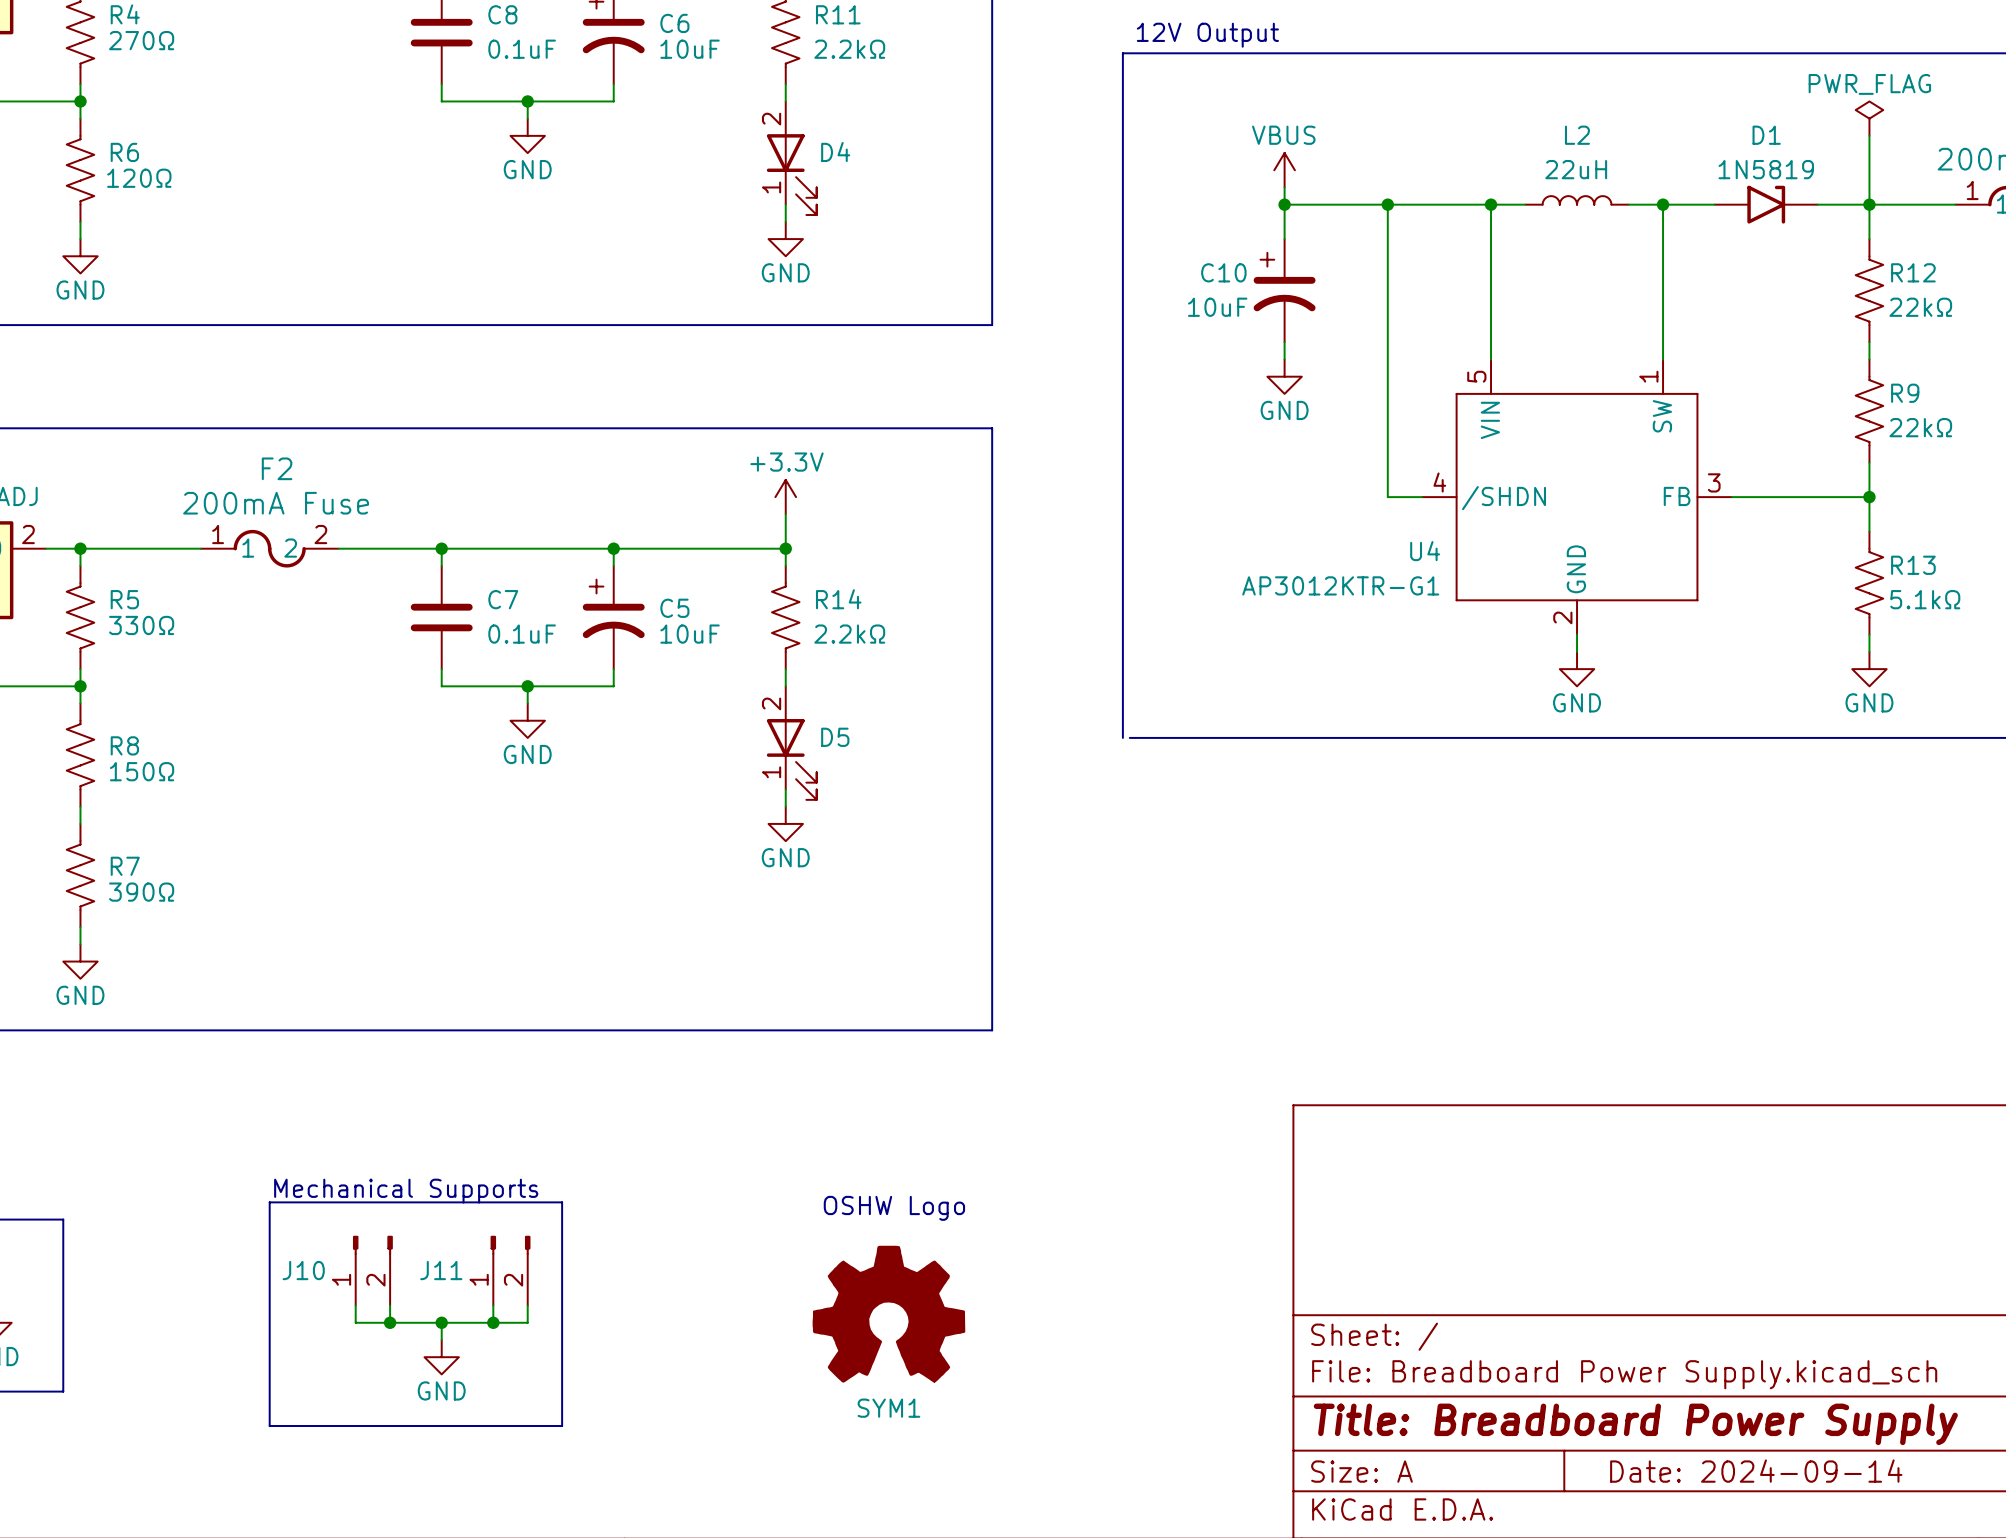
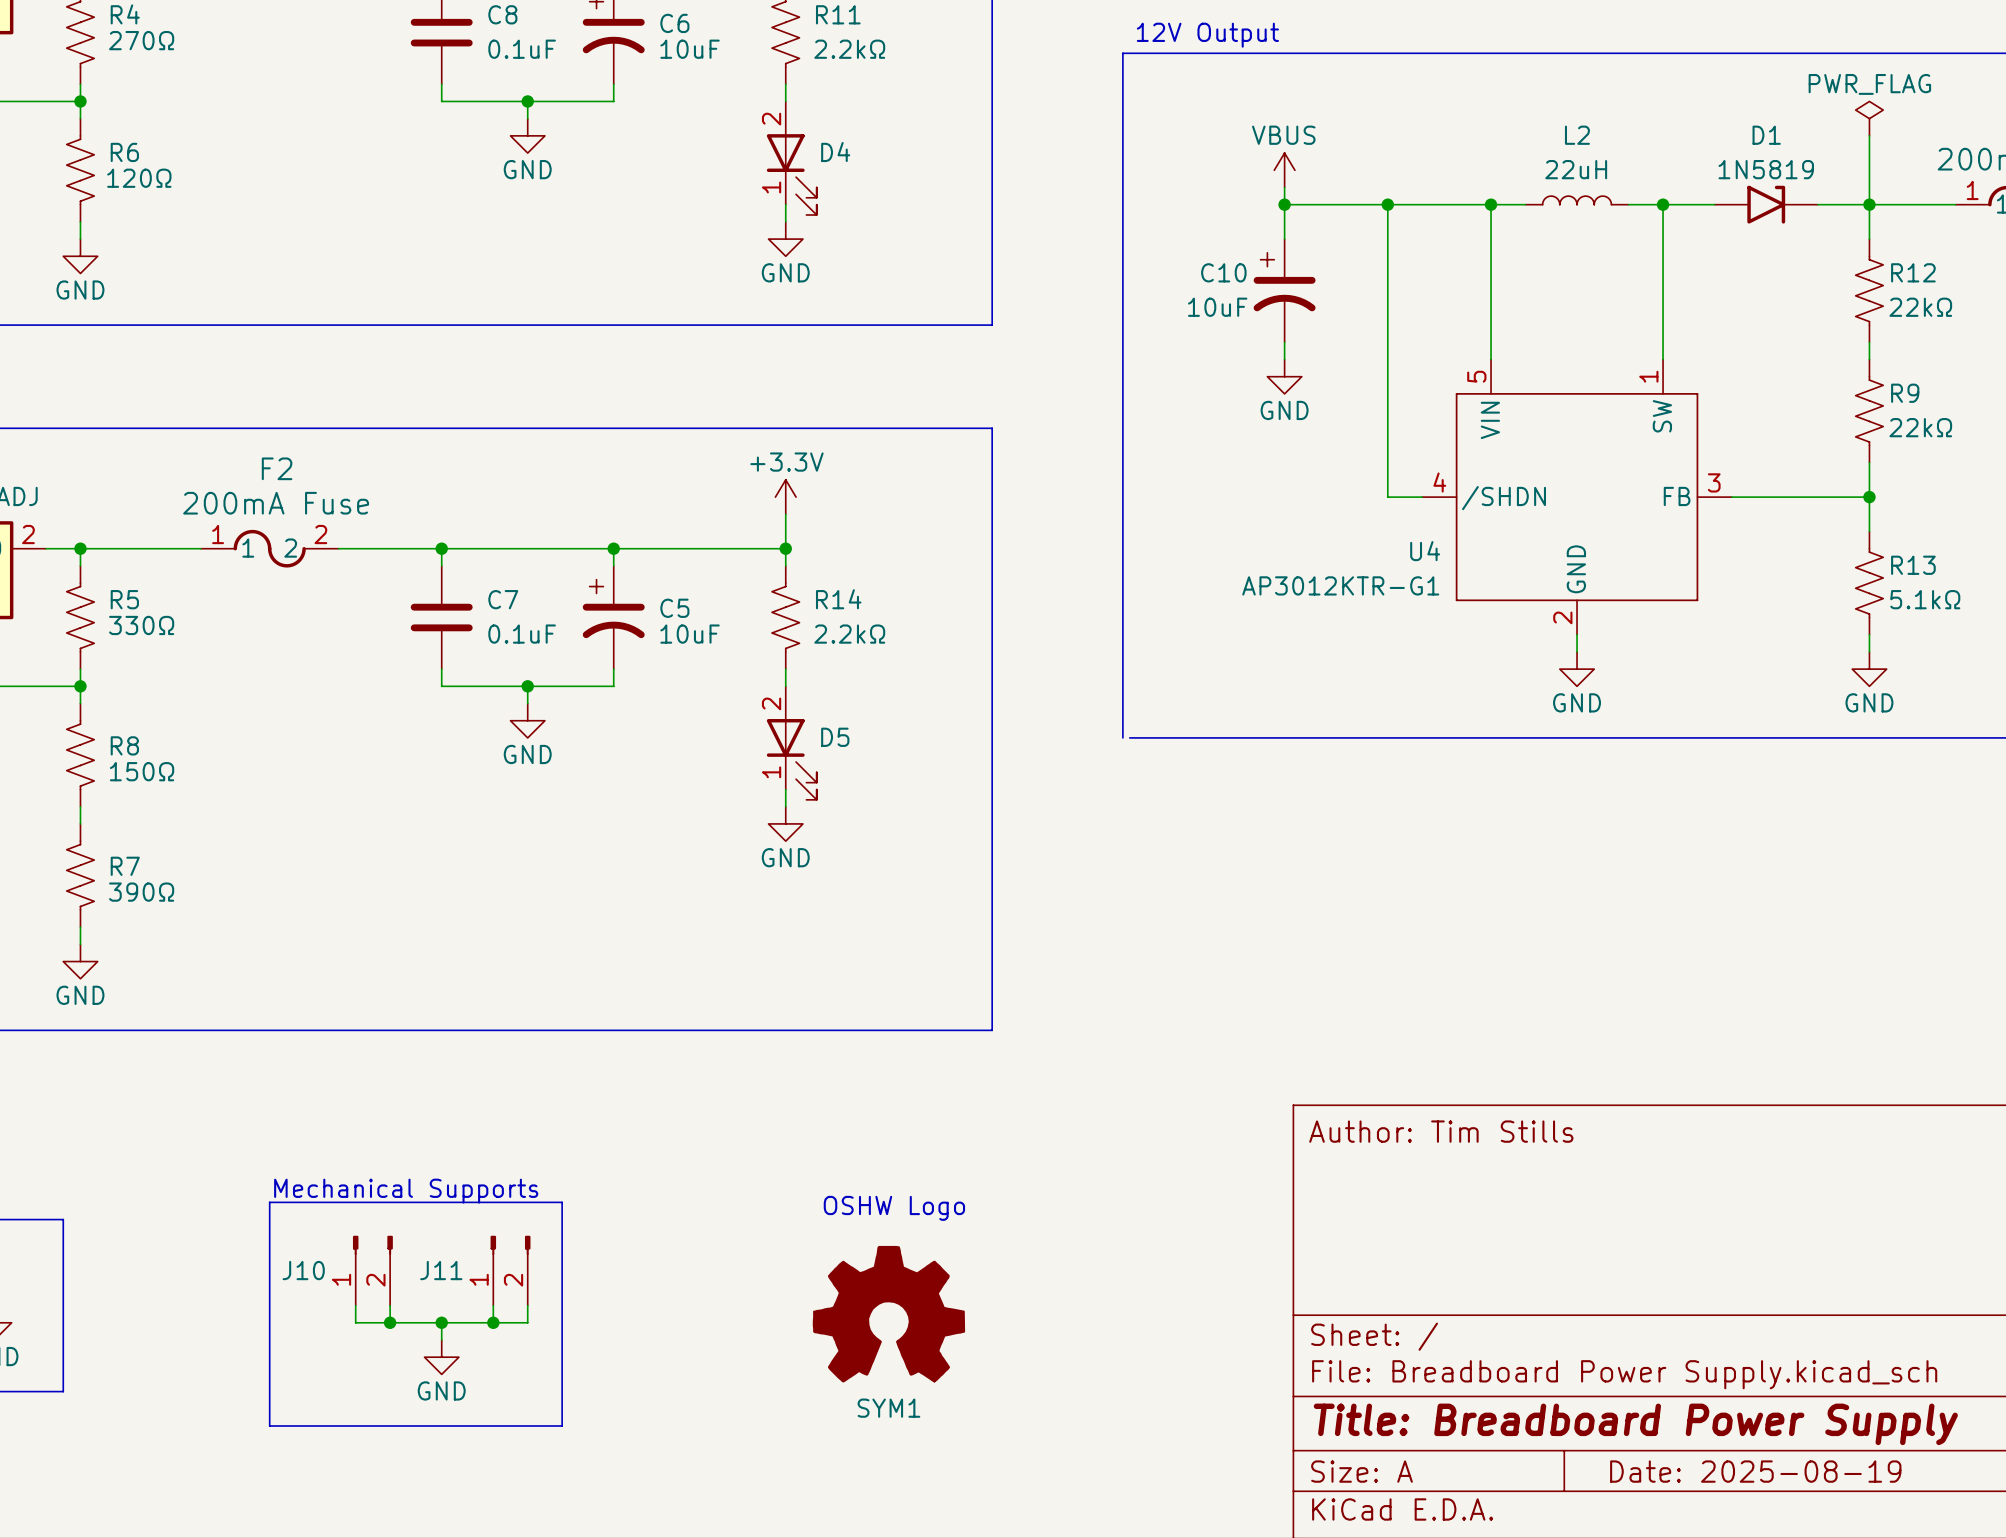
title block: none -> Author: Tim Stills (1441, 1131)
title block: Date: 2024-09-14 (1756, 1471) -> Date: 2025-08-19 (1755, 1471)

